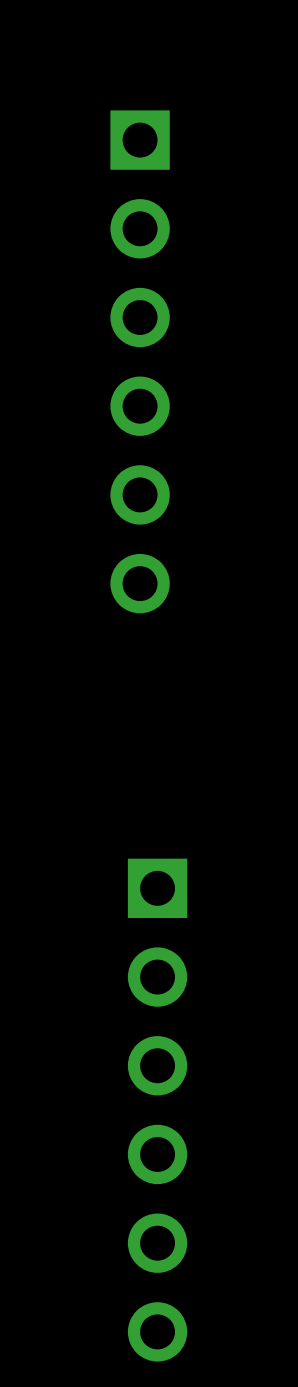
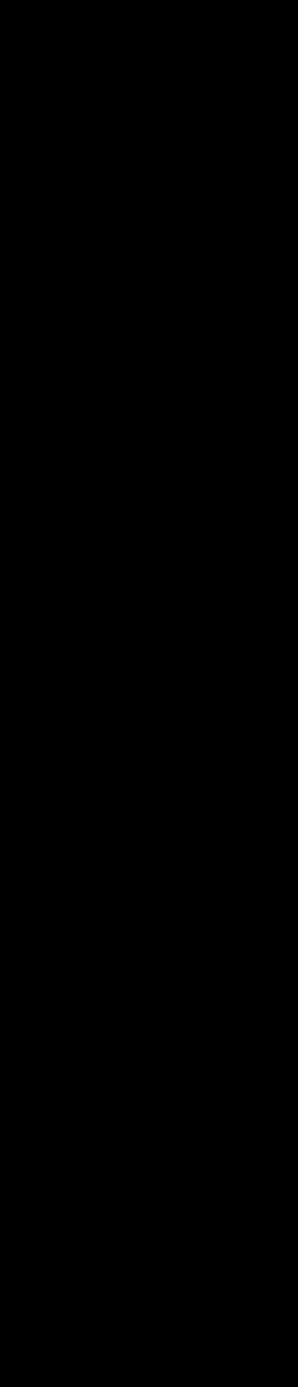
part: (140, 361) -> none
part: (157, 1110) -> none

